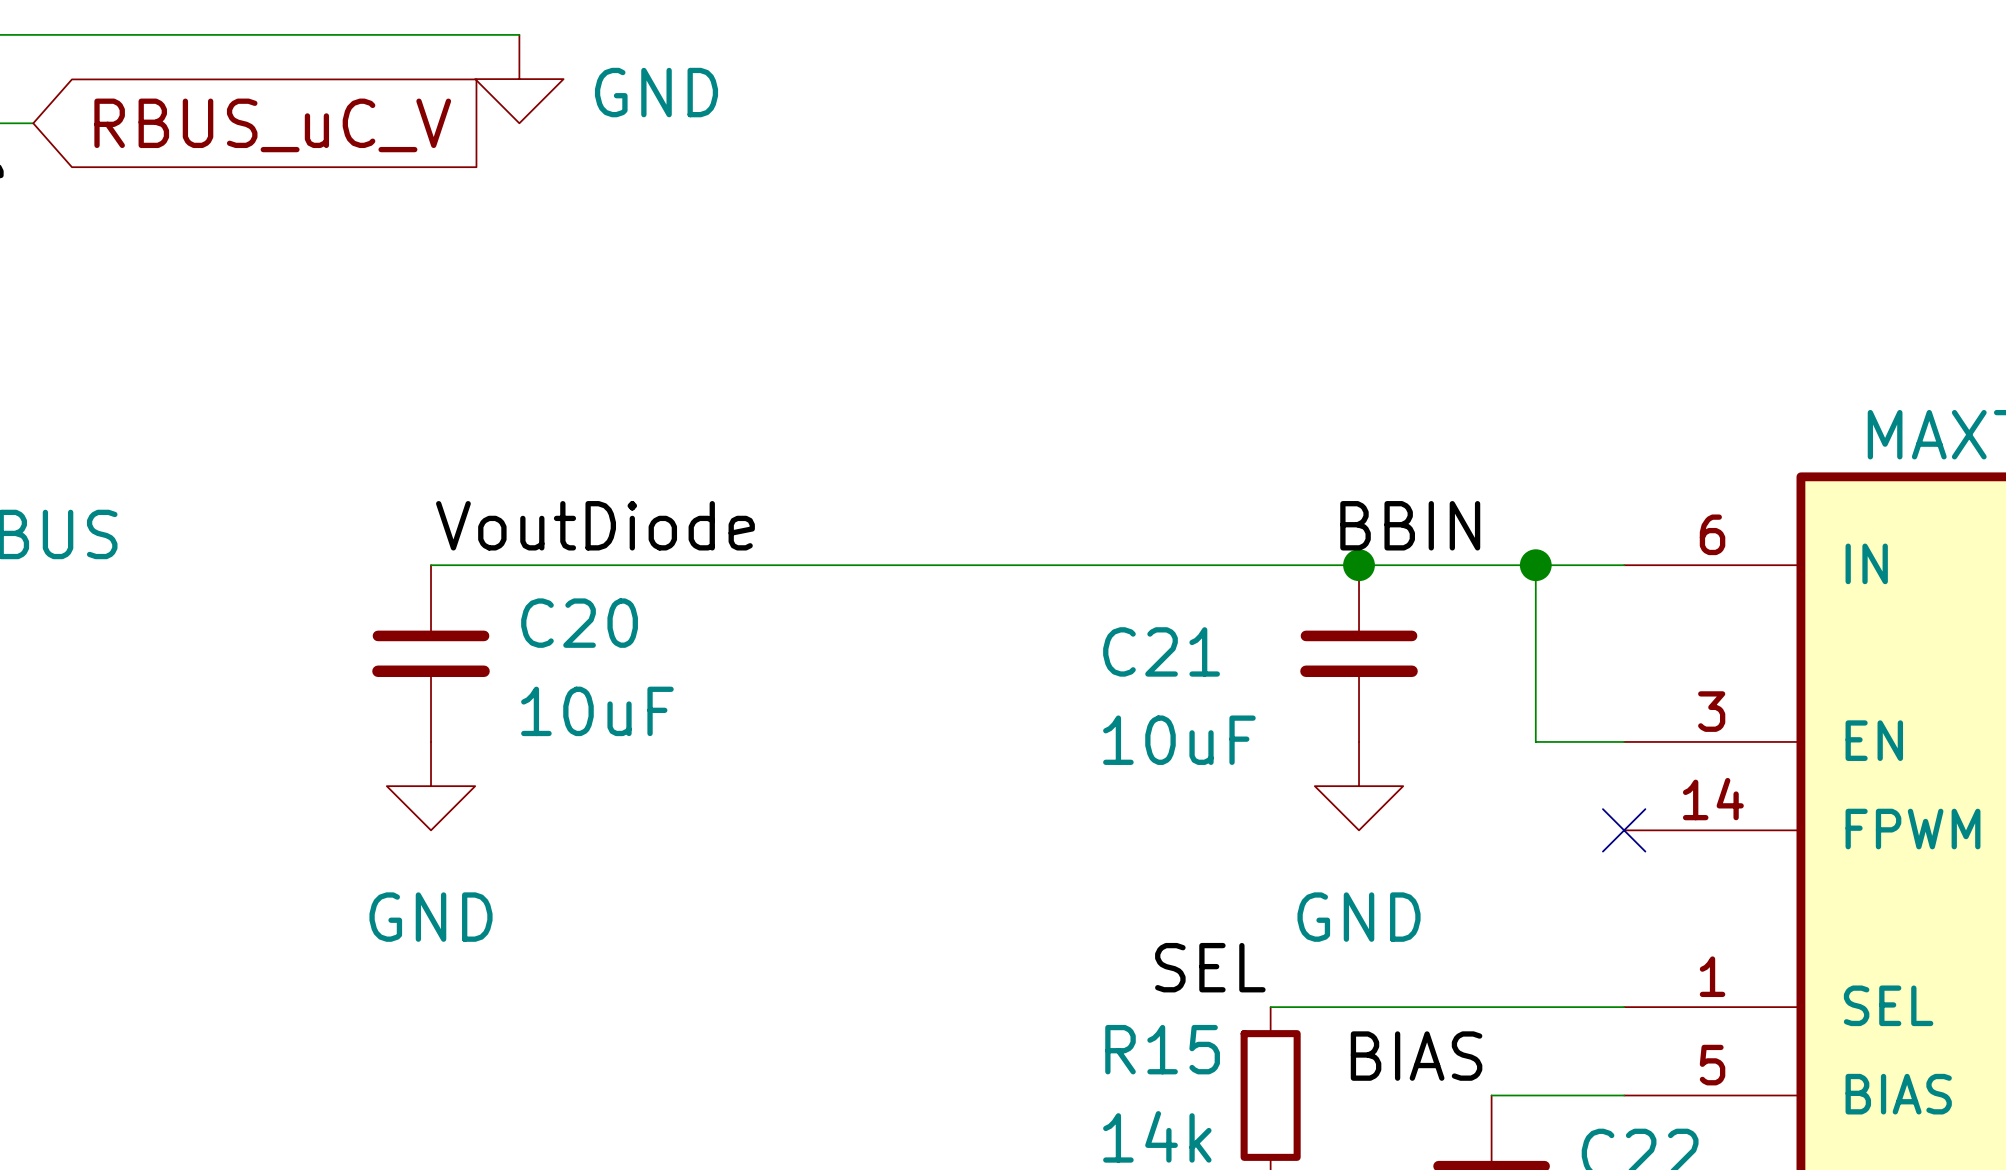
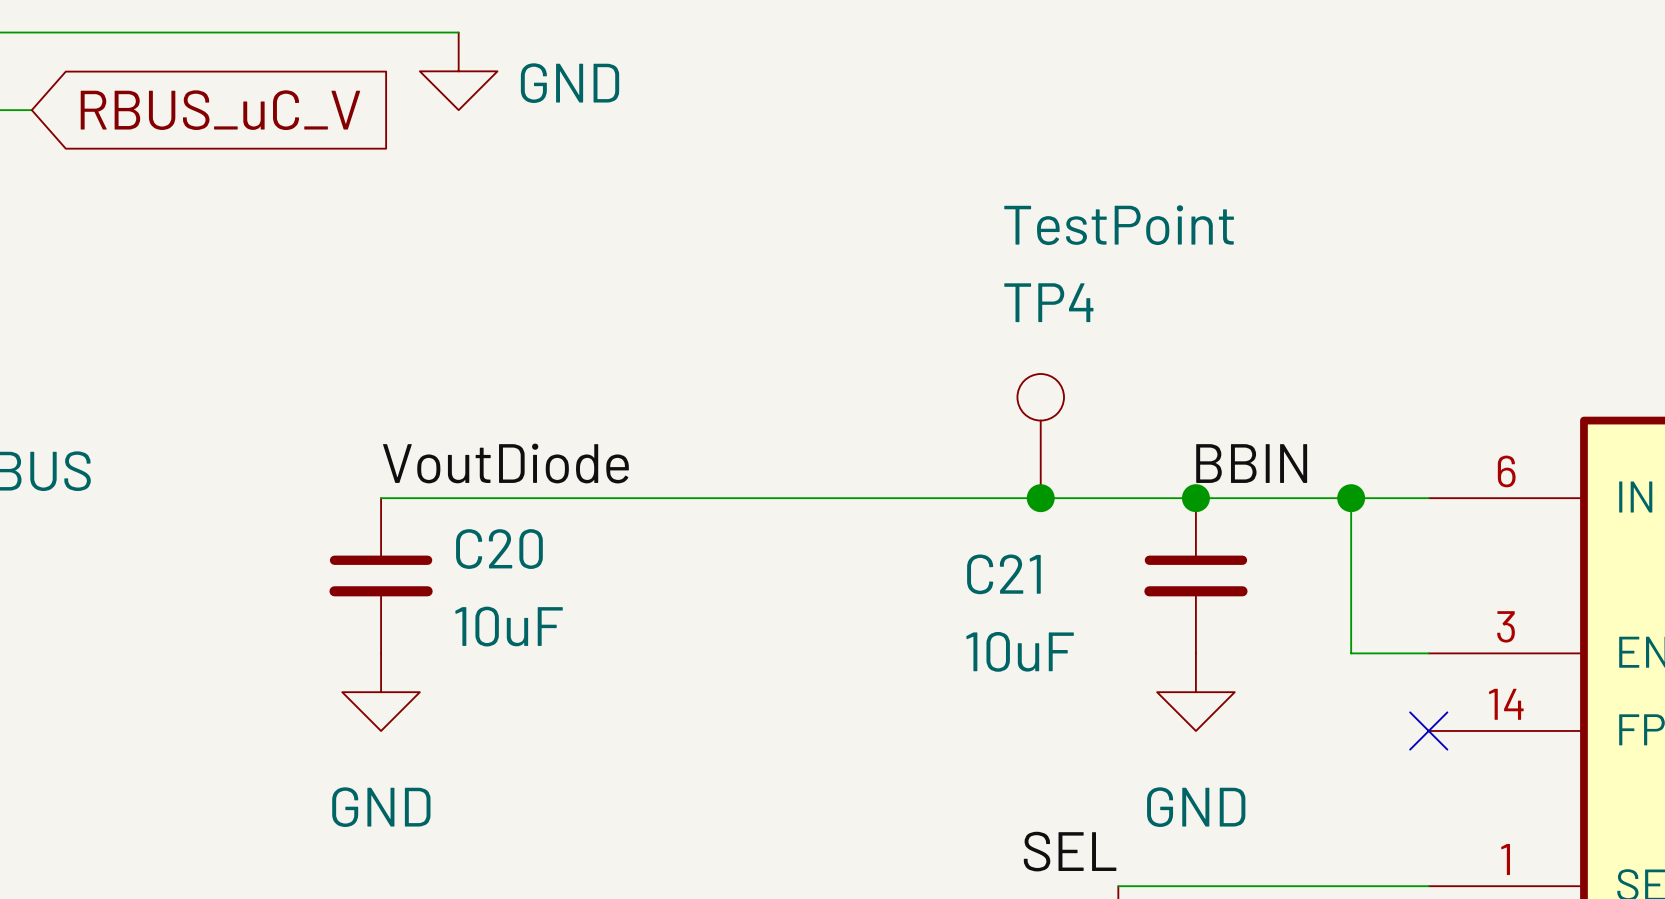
TP4: none -> TestPoint (1040, 436)
junction: none -> (1040, 498)

